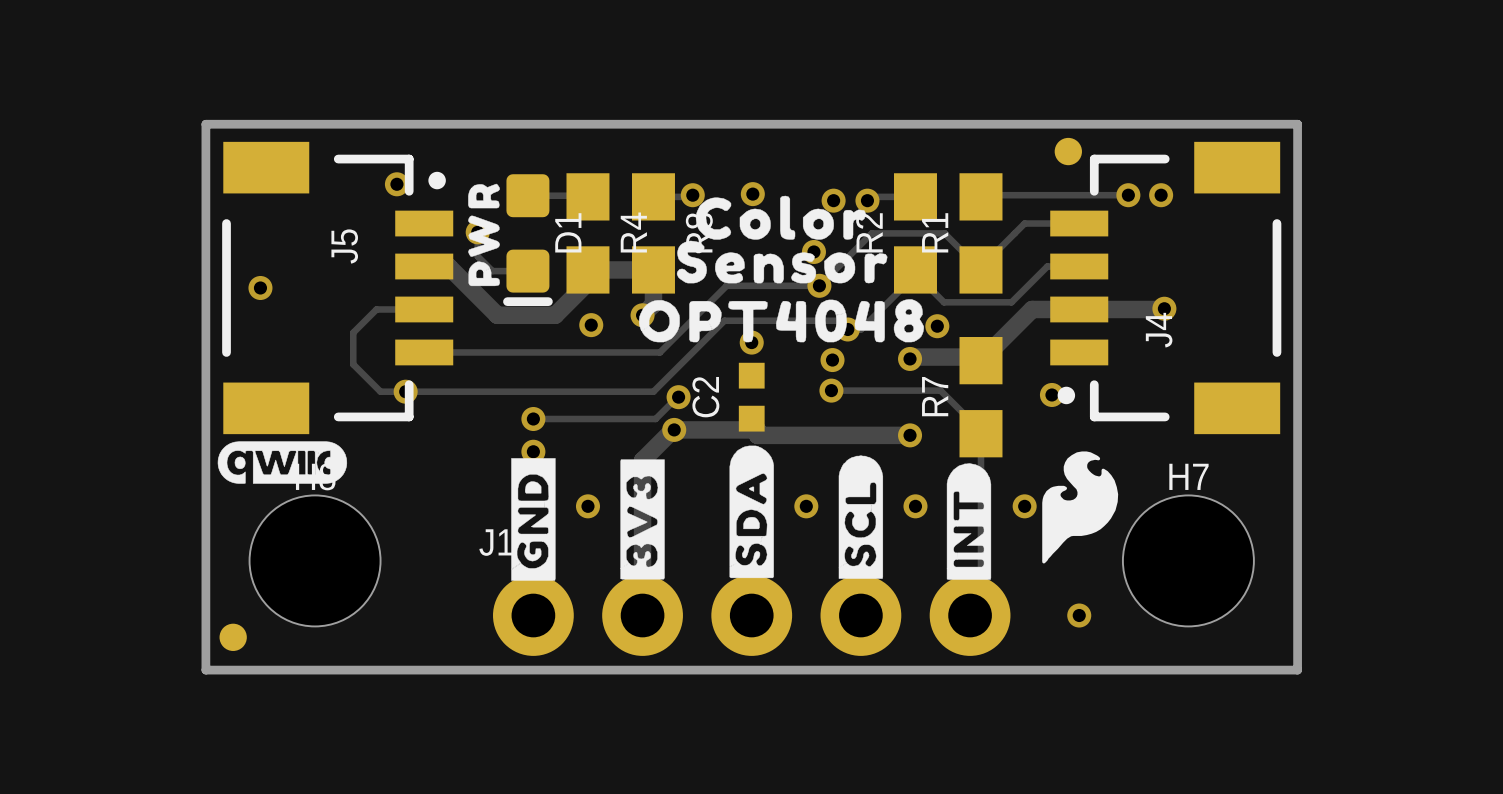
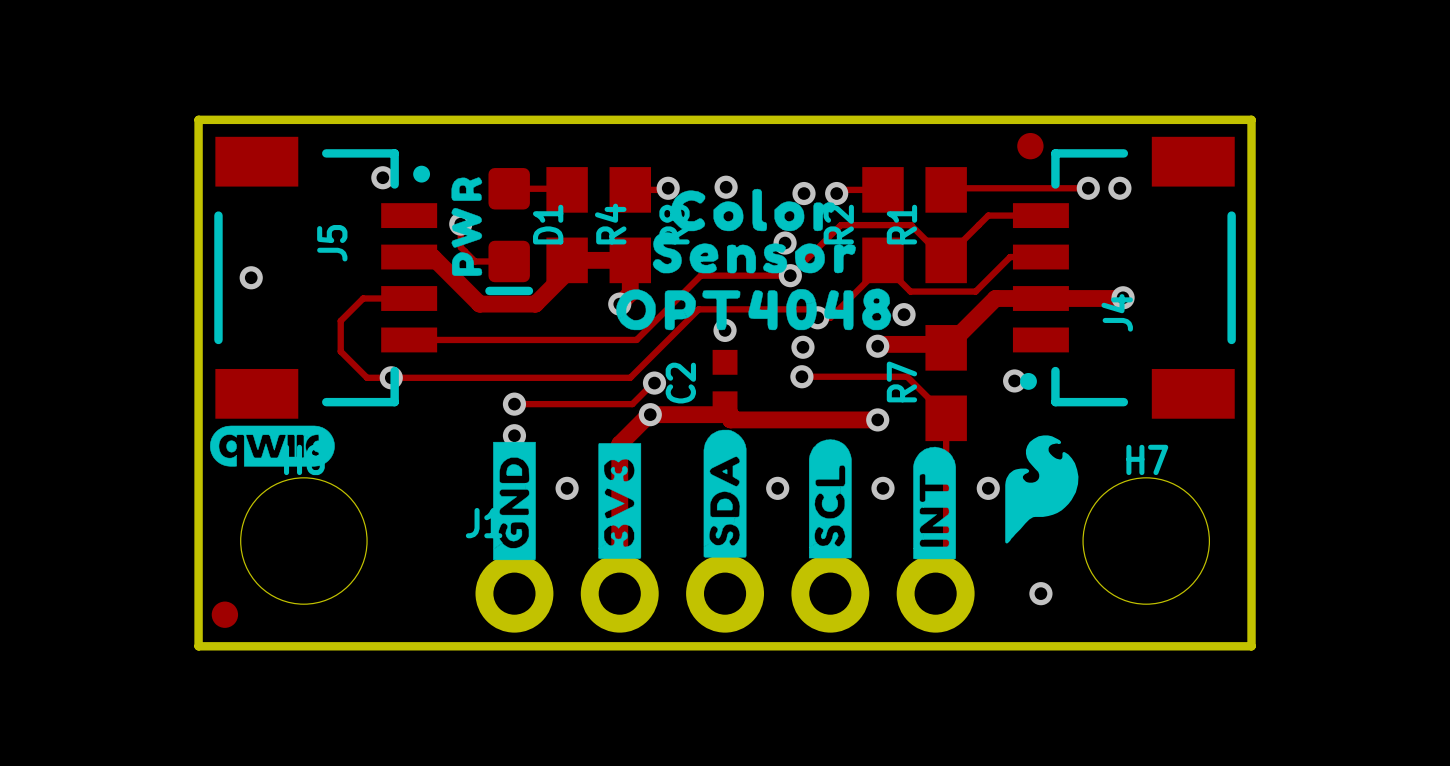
via: (591, 325) -> none

